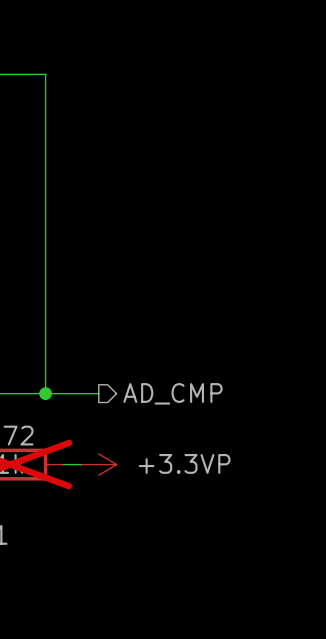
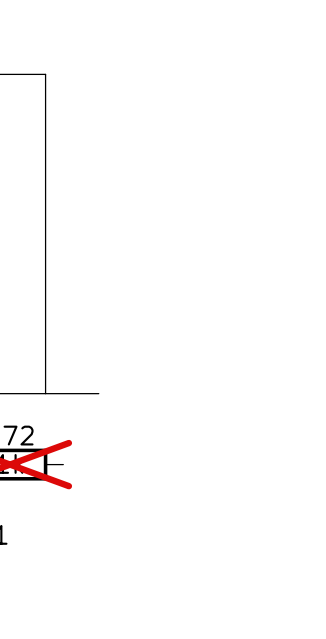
junction: (45, 393) -> none
hierarchical label: AD_CMP (172, 393) -> none
wire: (63, 464) (81, 464) -> none
power symbol: +3.3VP (98, 464) -> none

